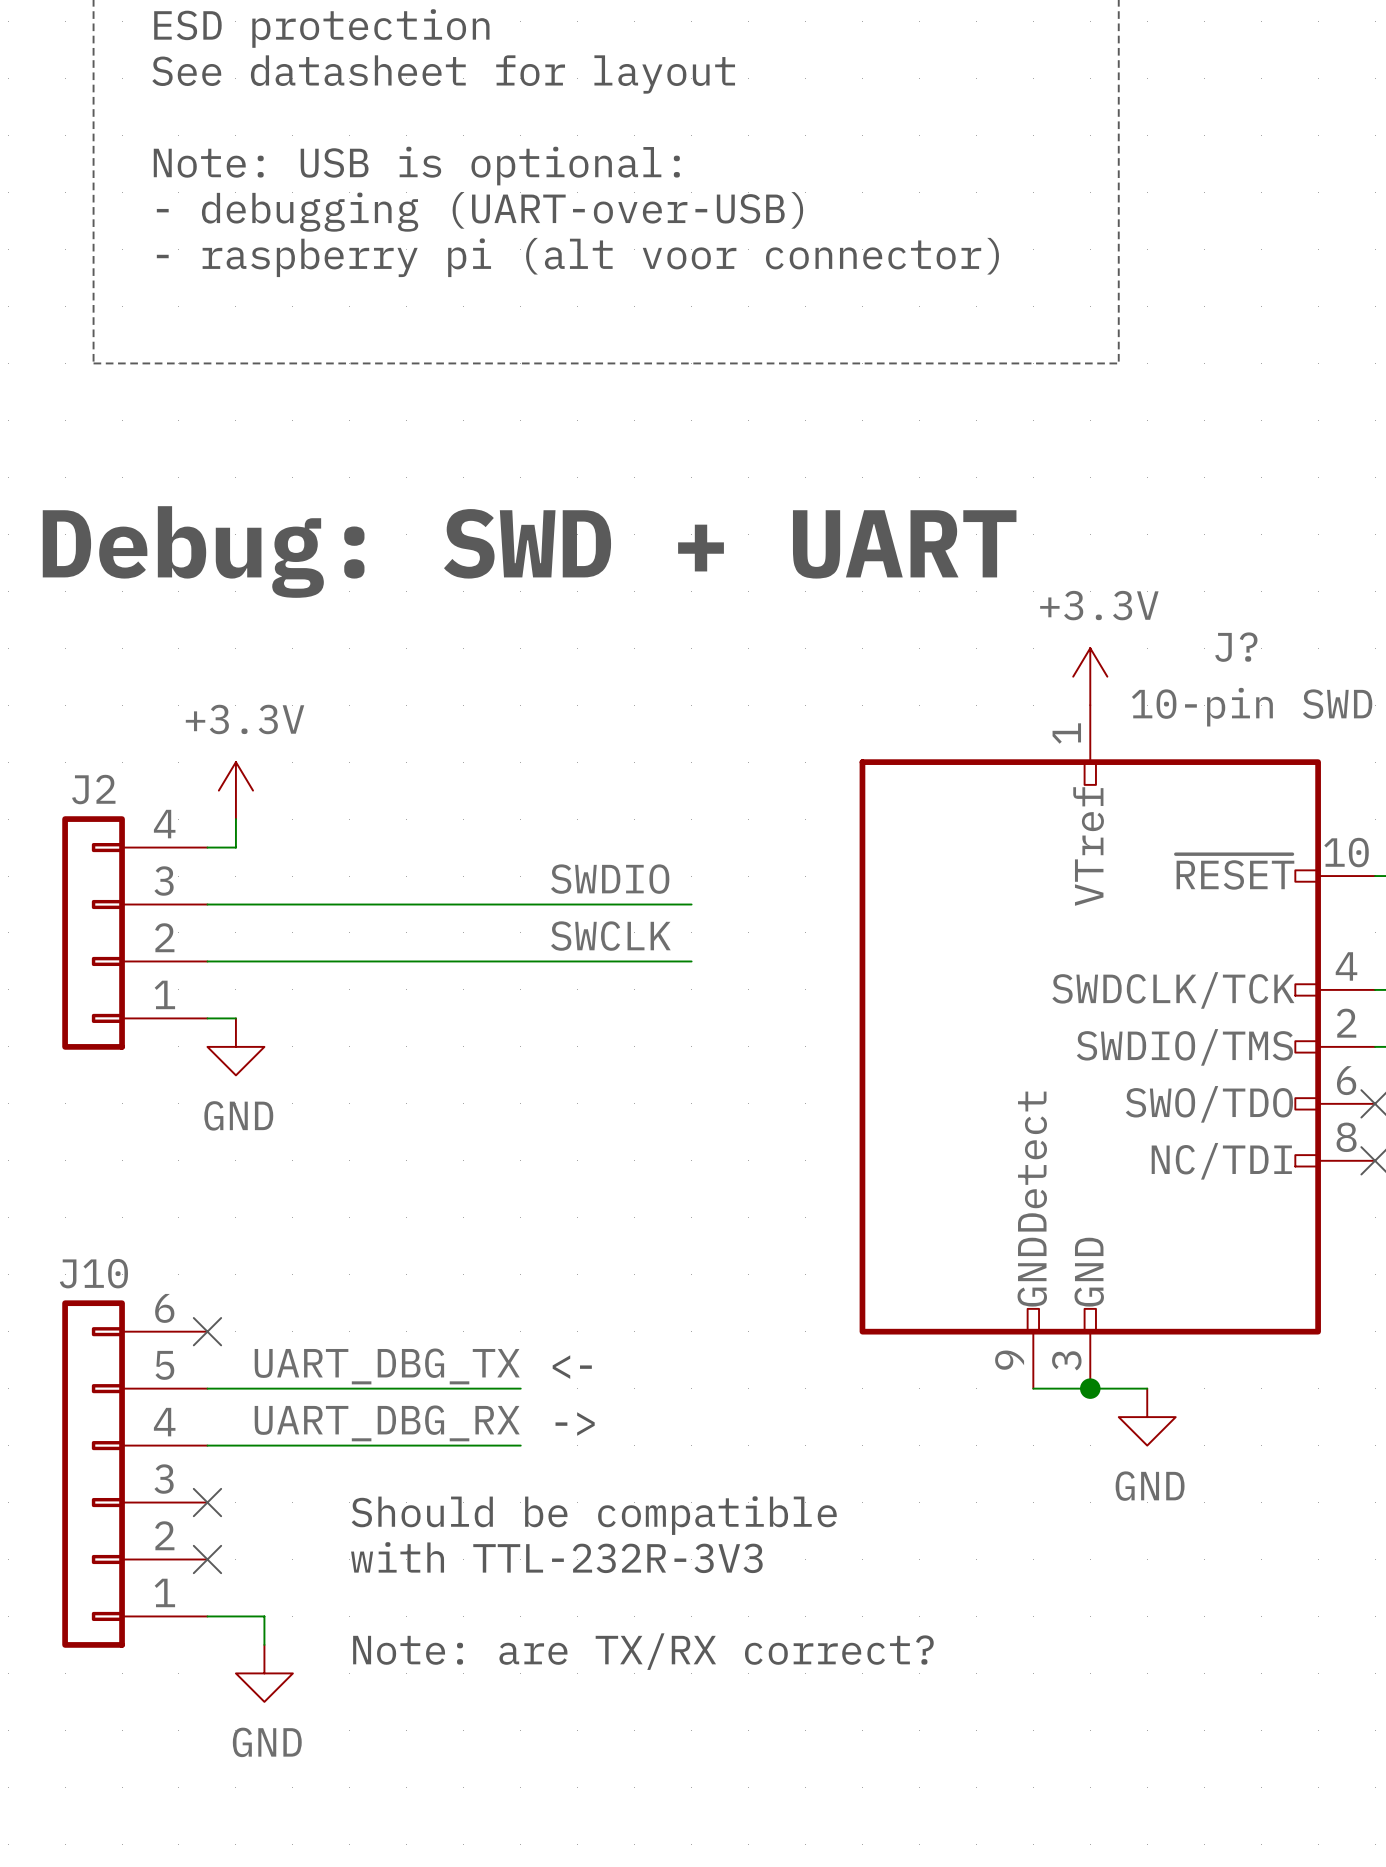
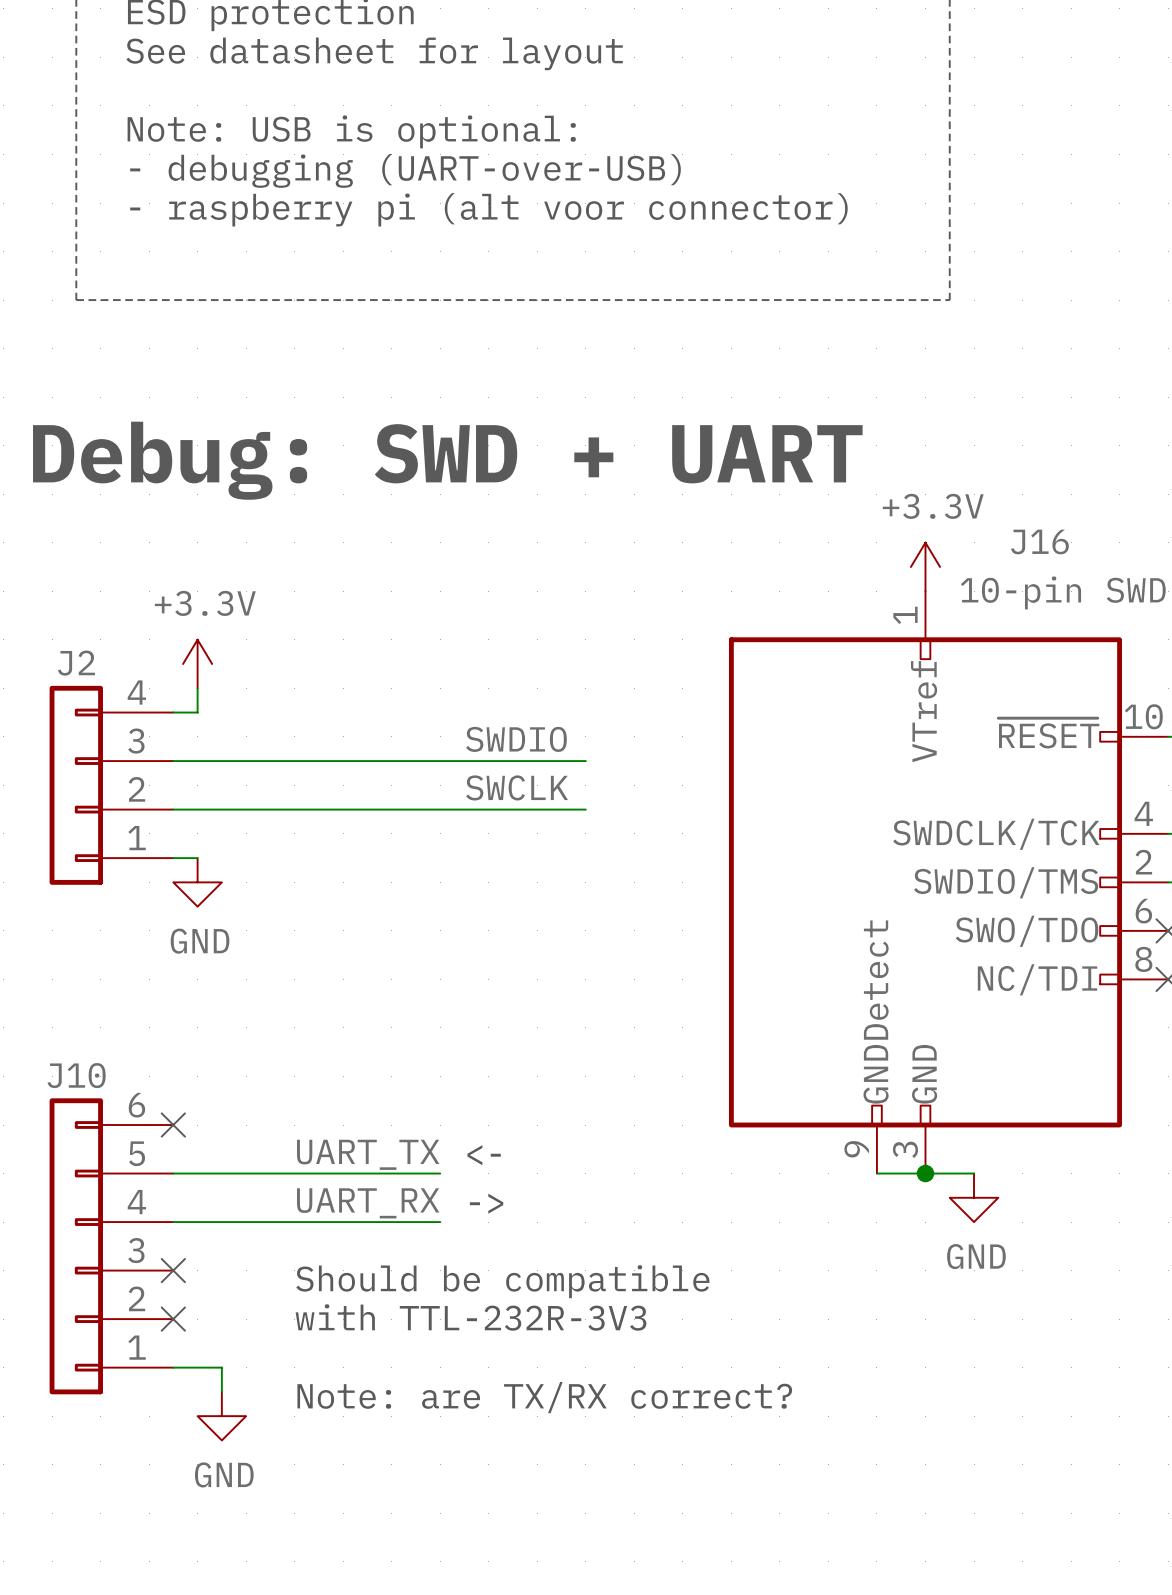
J? name: J? (1236, 647) -> J16 (1039, 542)
label: UART_DBG_TX (387, 1366) -> UART_TX (368, 1154)
label: UART_DBG_RX (387, 1423) -> UART_RX (368, 1203)

